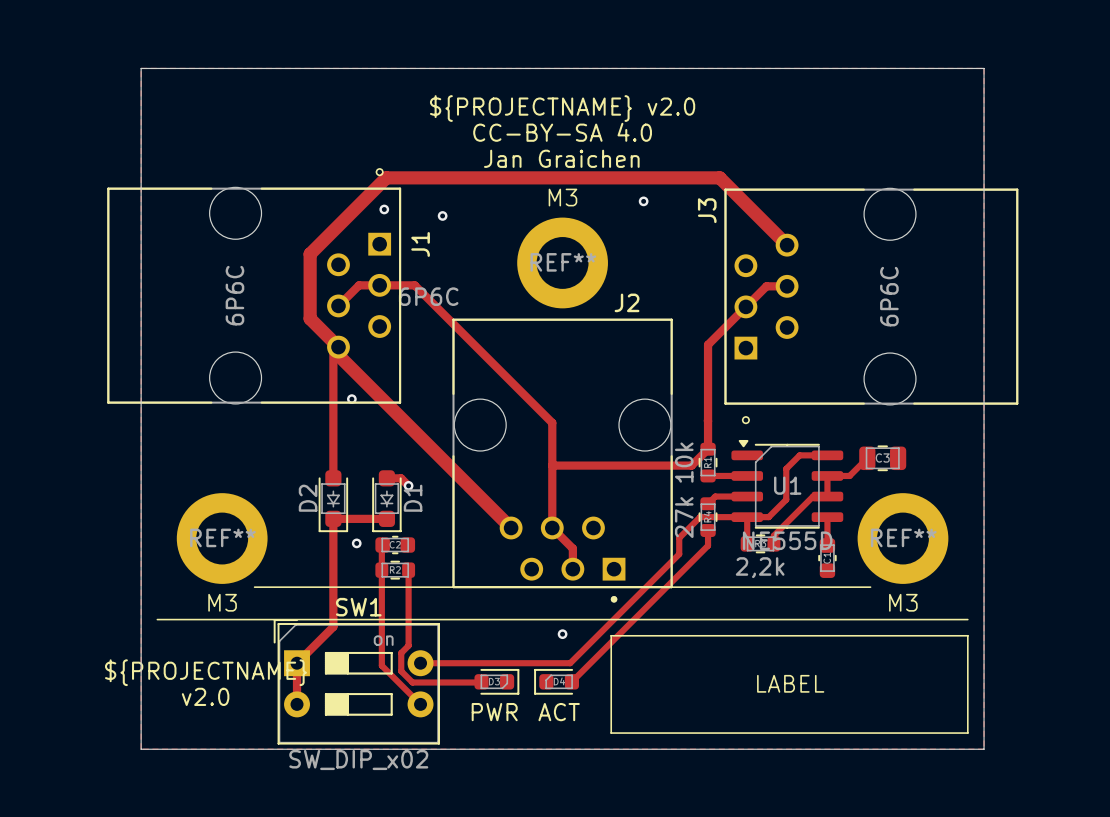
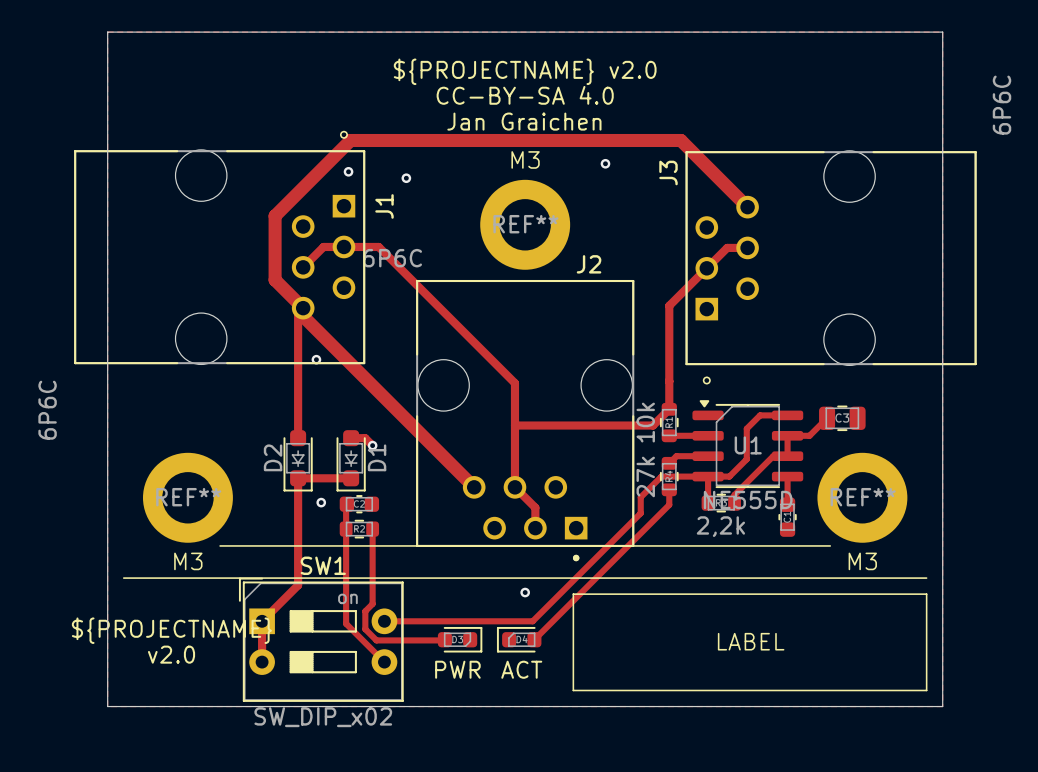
J1 value position: 6P6C (234, 295) -> 6P6C (47, 410)
J3 value position: 6P6C (889, 296) -> 6P6C (1001, 105)

